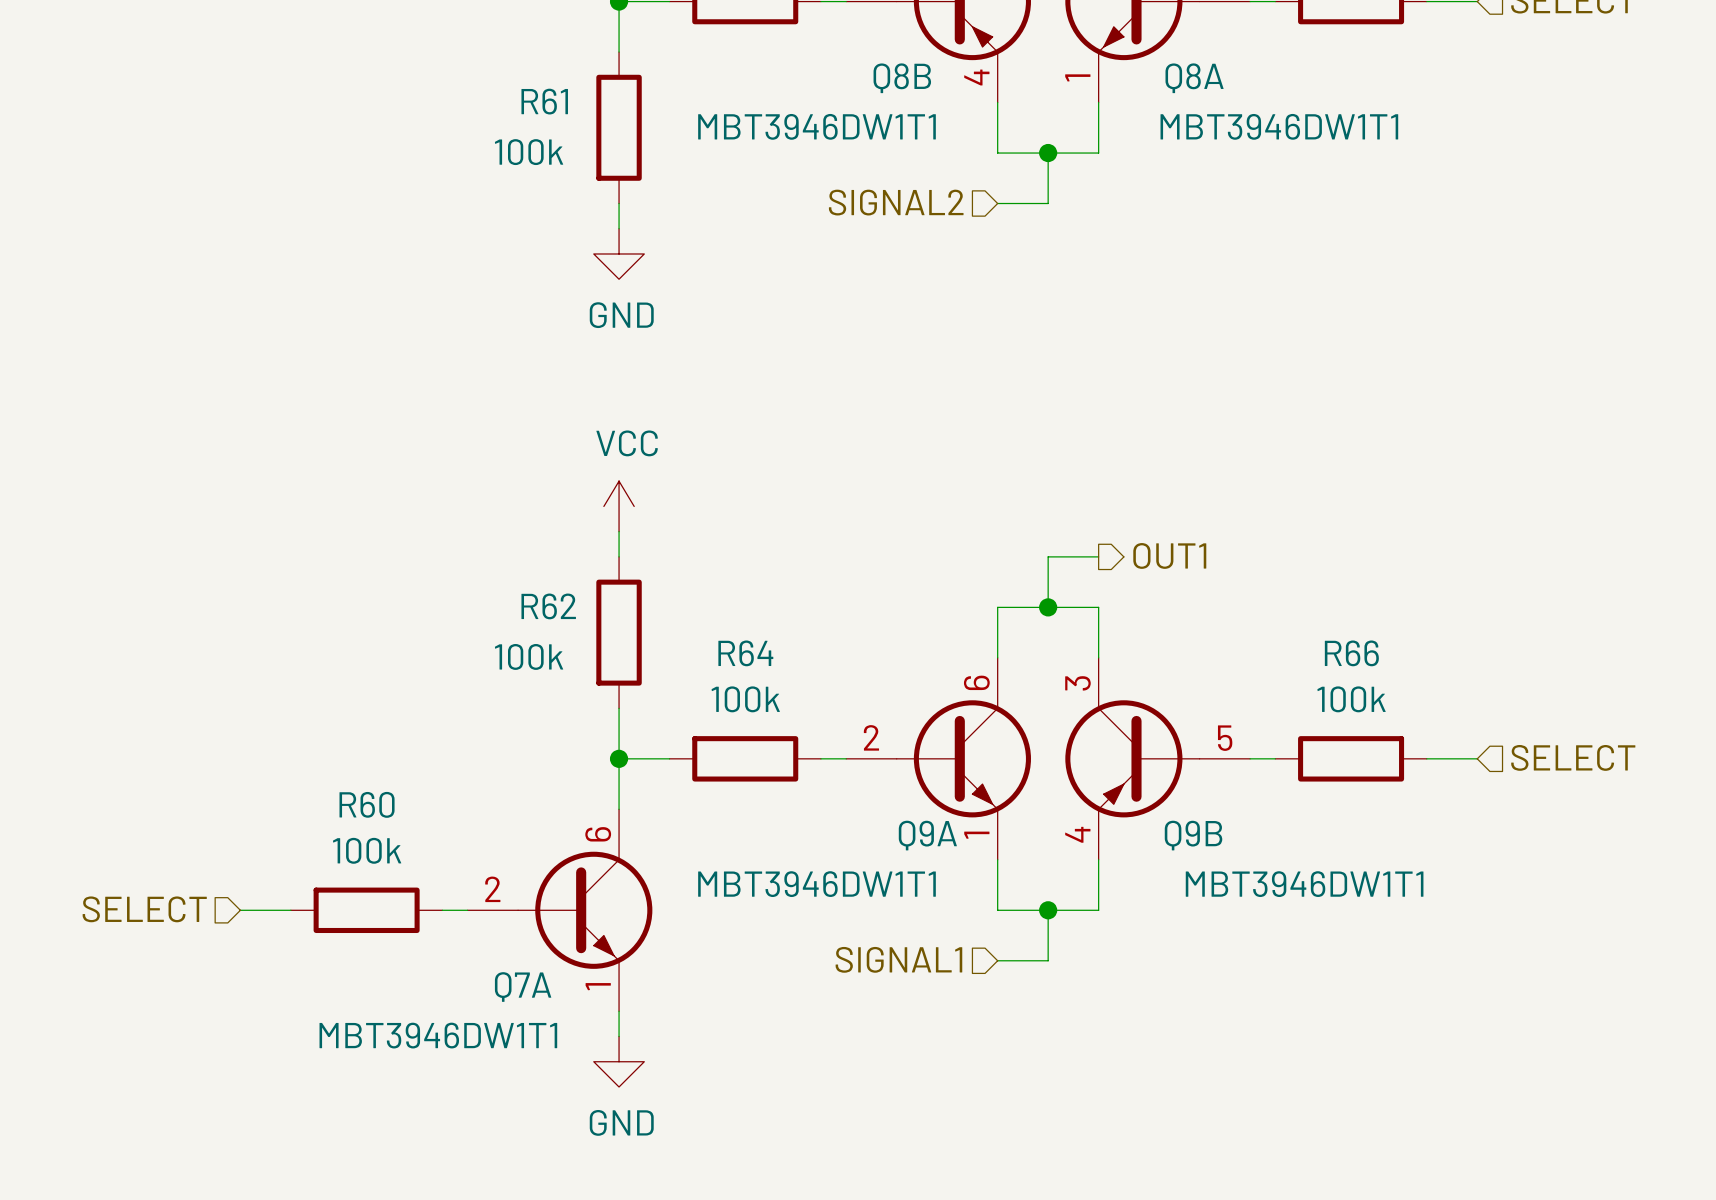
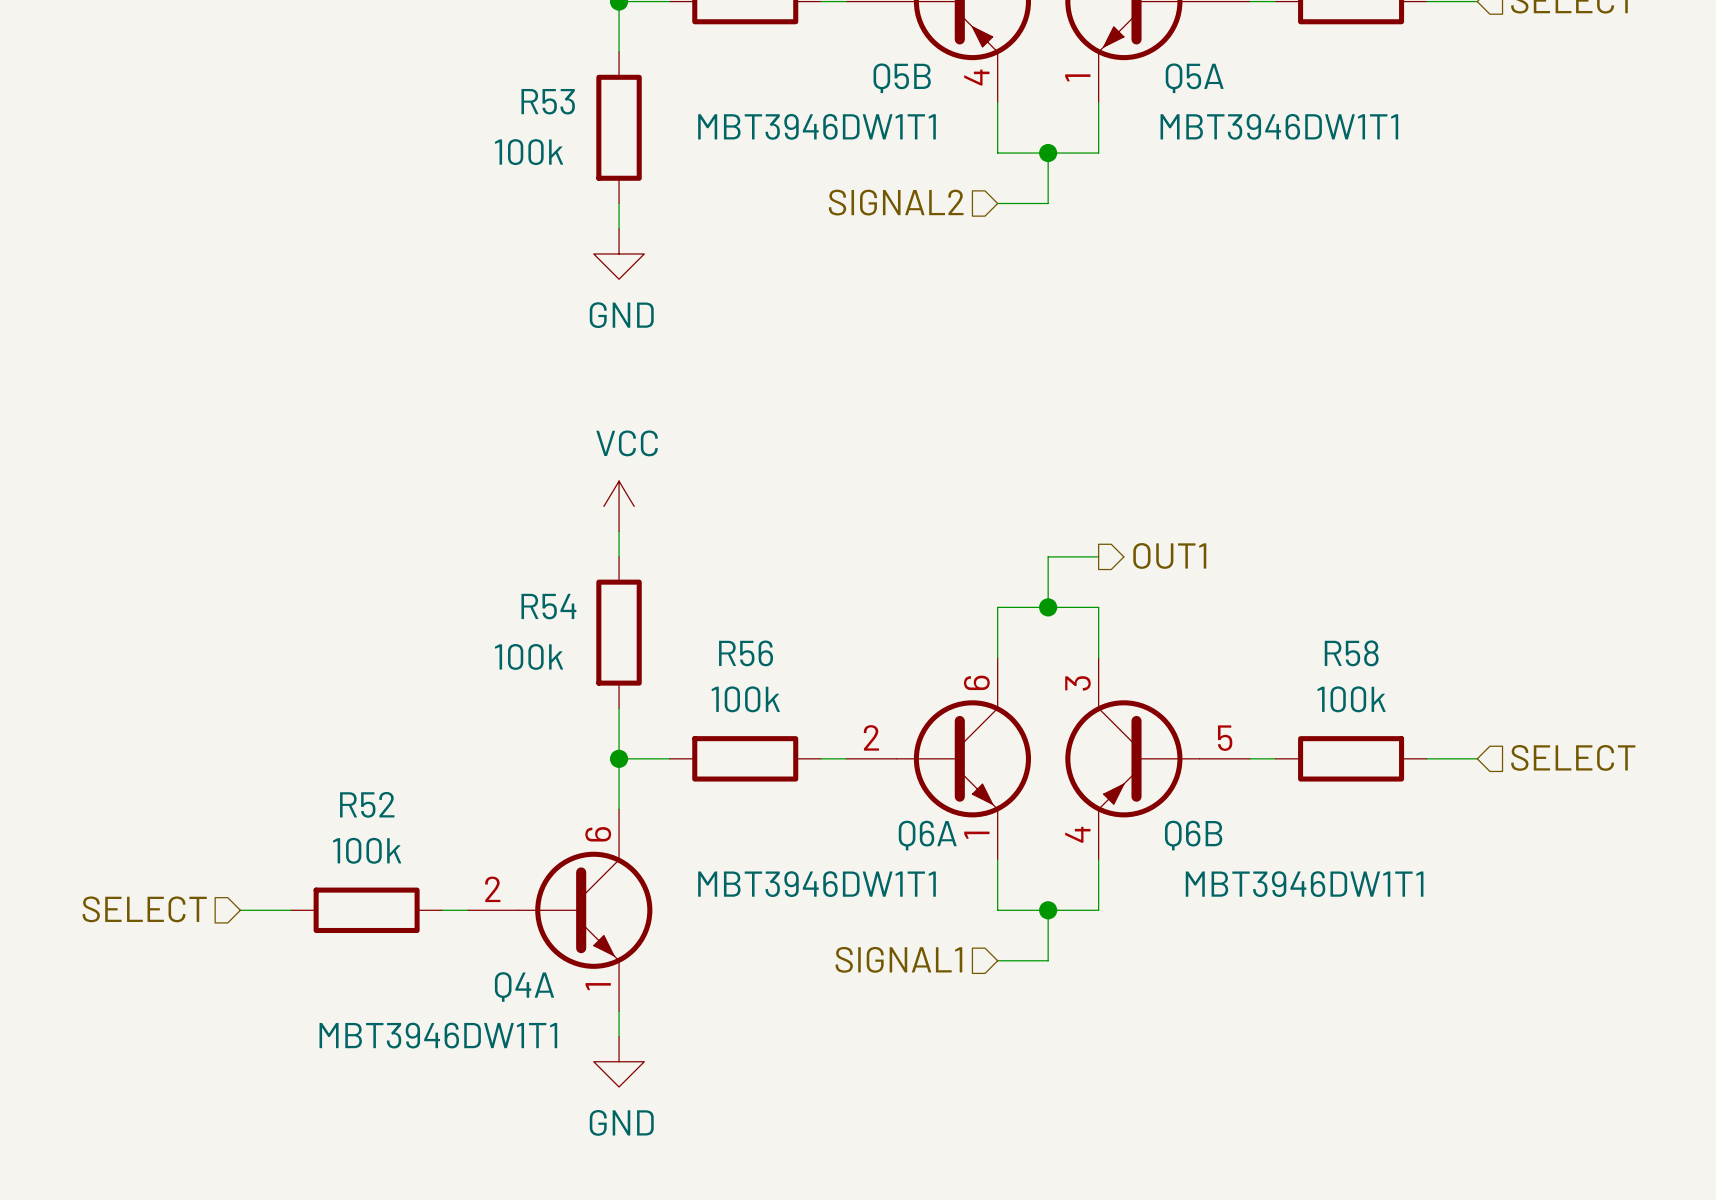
Q8B name: Q8B (902, 78) -> Q5B (902, 78)
Q8A name: Q8A (1194, 78) -> Q5A (1194, 78)
R61 name: R61 (544, 101) -> R53 (548, 101)
R62 name: R62 (548, 606) -> R54 (548, 606)
R64 name: R64 (745, 653) -> R56 (746, 653)
R66 name: R66 (1351, 653) -> R58 (1351, 653)
R60 name: R60 (367, 804) -> R52 (367, 804)
Q9A name: Q9A (927, 835) -> Q6A (927, 835)
Q9B name: Q9B (1193, 835) -> Q6B (1193, 835)
Q7A name: Q7A (523, 987) -> Q4A (524, 987)

